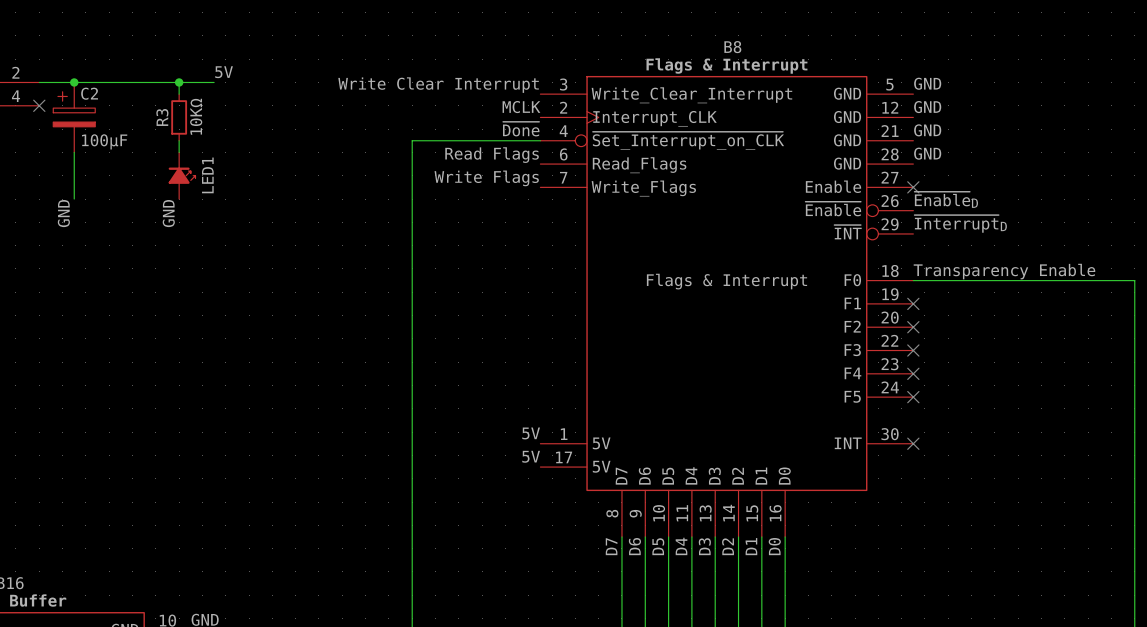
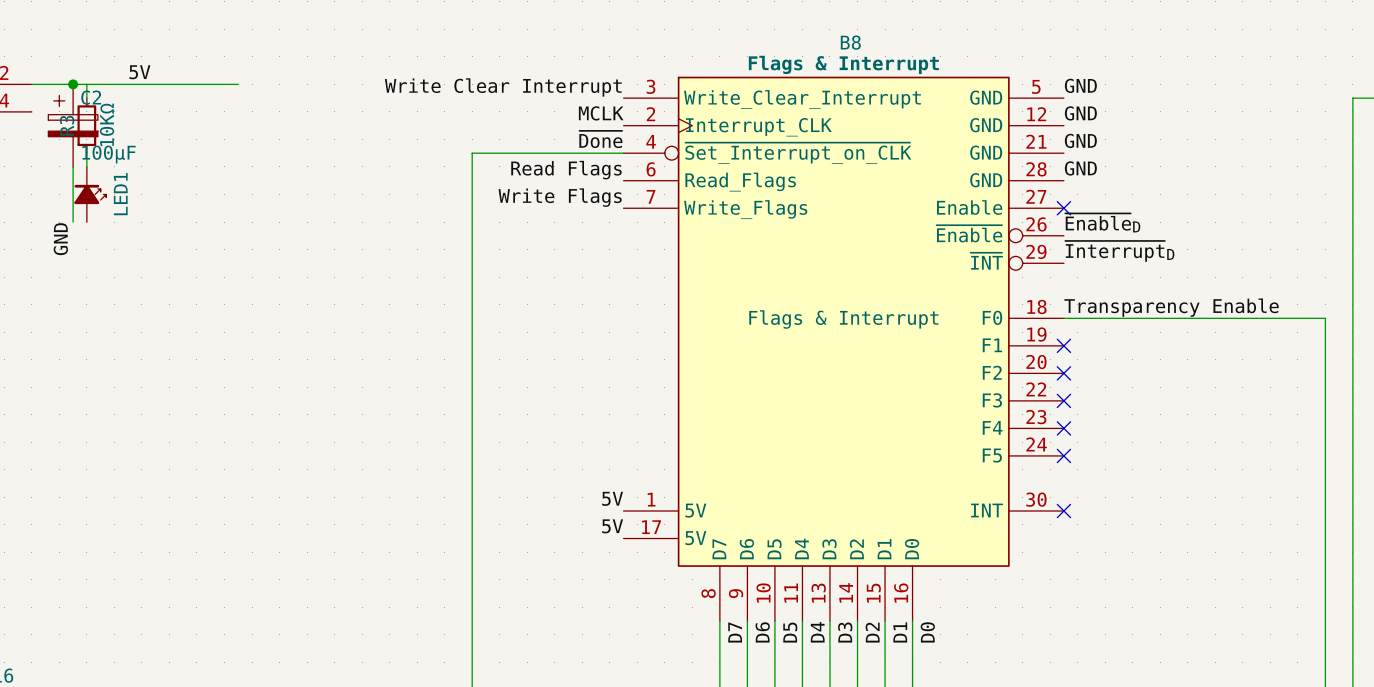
label position: 5V (224, 72) -> 5V (139, 72)
wire: (179, 82) (179, 94) -> (86, 84) (86, 98)
junction: (179, 82) -> none
no-connect mark: (39, 105) -> none
R3 position: (179, 117) -> (86, 125)
wire: (179, 140) (179, 152) -> (86, 153) (86, 166)
LED1 position: (182, 175) -> (90, 194)
label: GND (168, 213) -> none
label: D7 (611, 546) -> none
label: D6 (634, 546) -> D7 (735, 632)
label: D5 (658, 546) -> D6 (762, 632)
label: D4 (681, 546) -> D5 (790, 632)
label: D3 (704, 546) -> D4 (817, 632)
label: D2 (728, 546) -> D3 (845, 632)
label: D1 (751, 546) -> D2 (872, 632)
label: D0 (774, 546) -> D1 (900, 632)
label: none -> D0 (927, 632)

